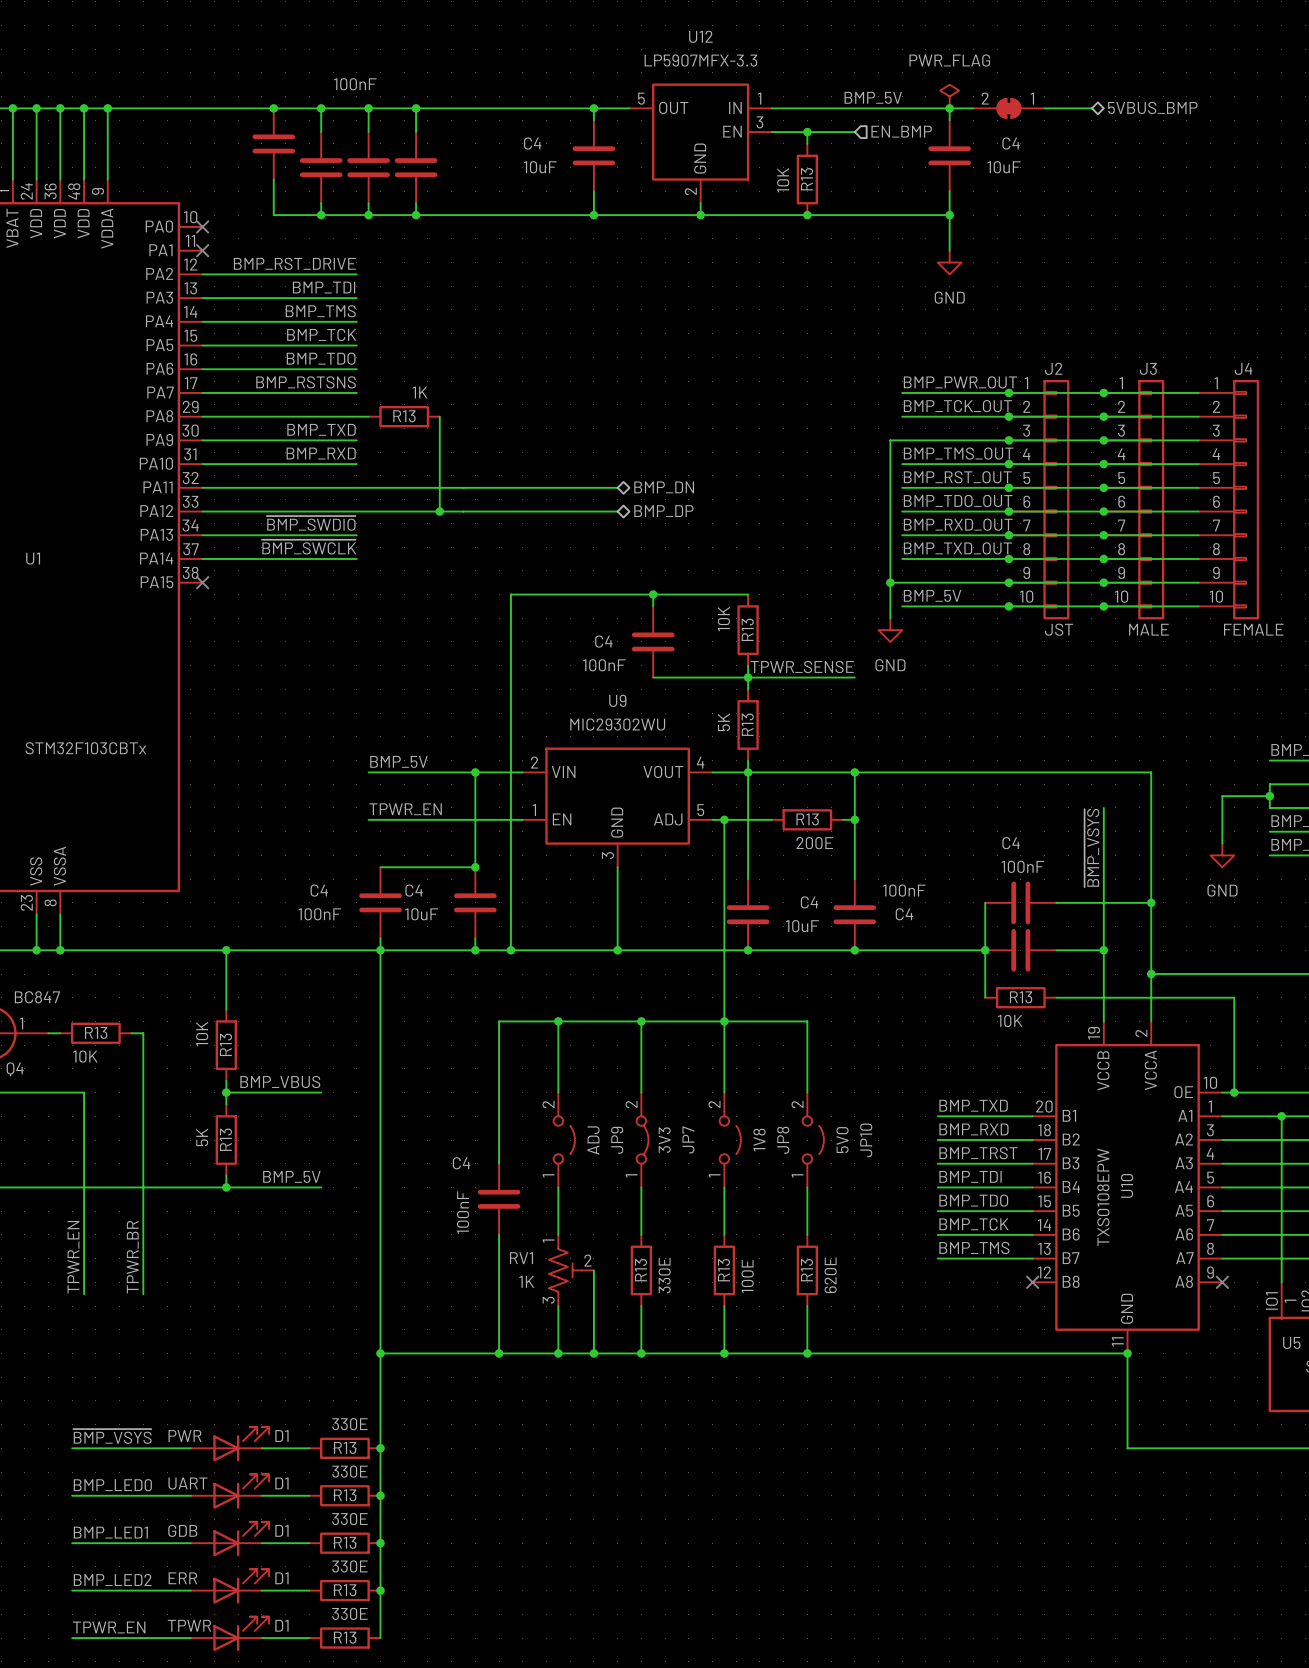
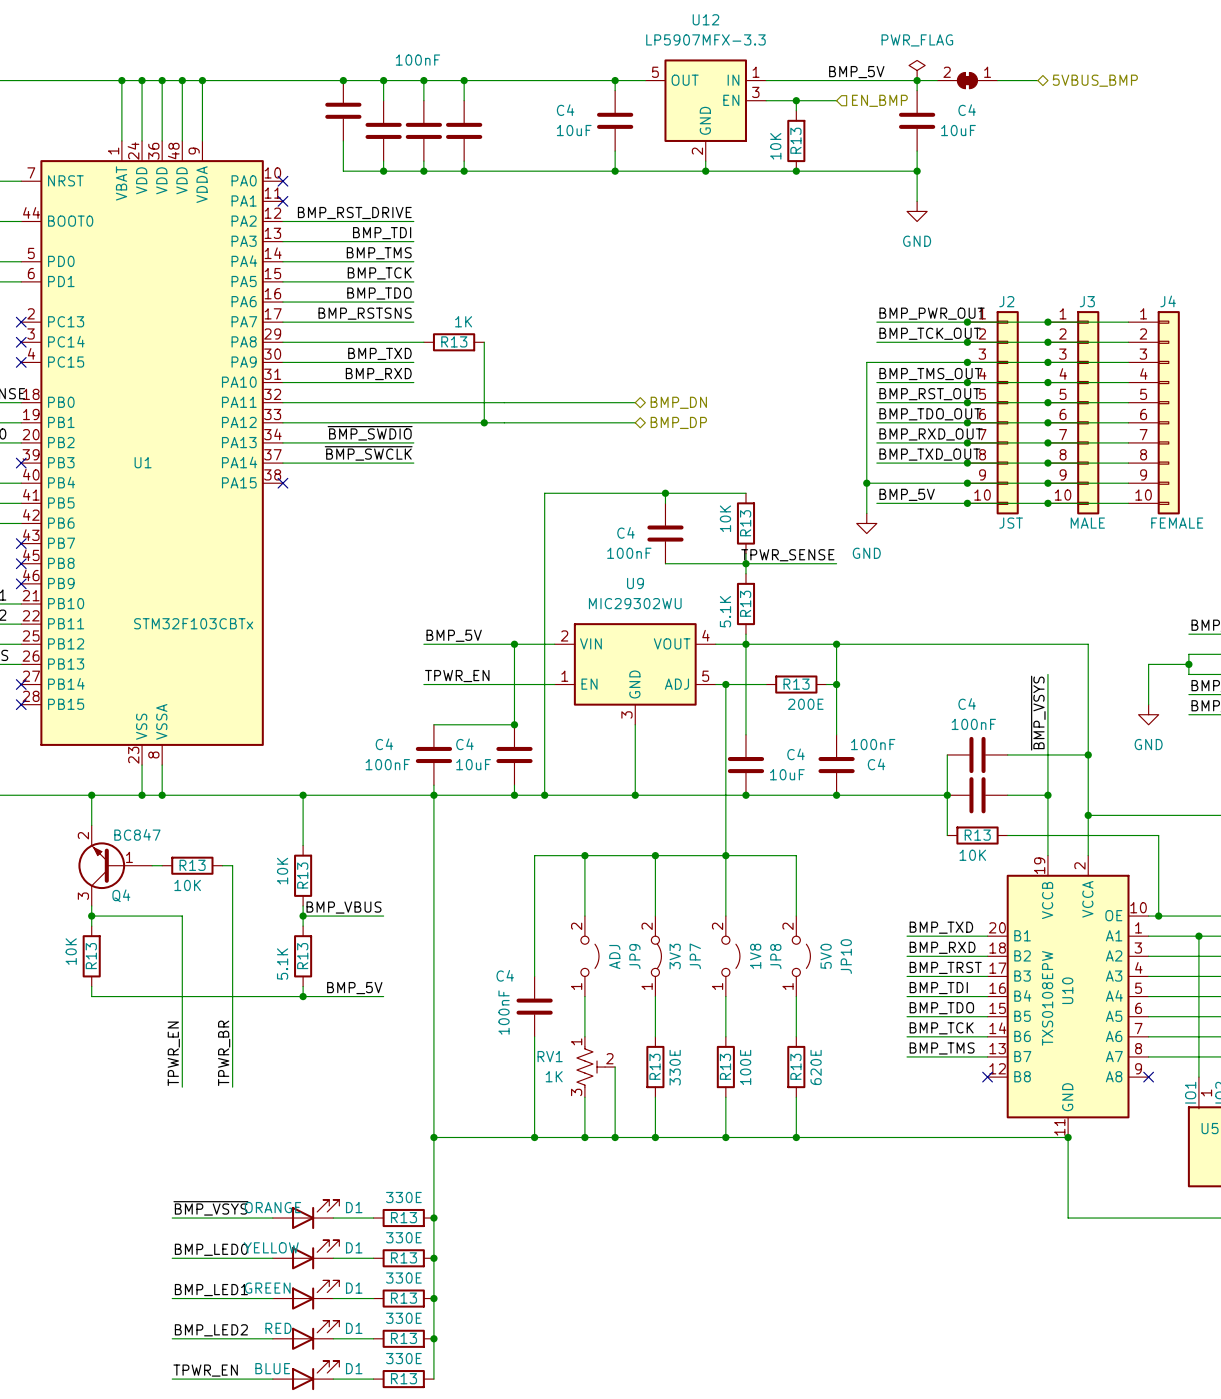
R13 value: 5K (723, 722) -> 5.1K (725, 611)
R13 value: 5K (202, 1137) -> 5.1K (282, 964)
D1 value: PWR (185, 1436) -> ORANGE (272, 1207)
D1 value: UART (188, 1483) -> YELLOW (271, 1247)
D1 value: GDB (182, 1530) -> GREEN (267, 1288)
D1 value: ERR (182, 1578) -> RED (278, 1328)
D1 value: TPWR (189, 1625) -> BLUE (272, 1368)

